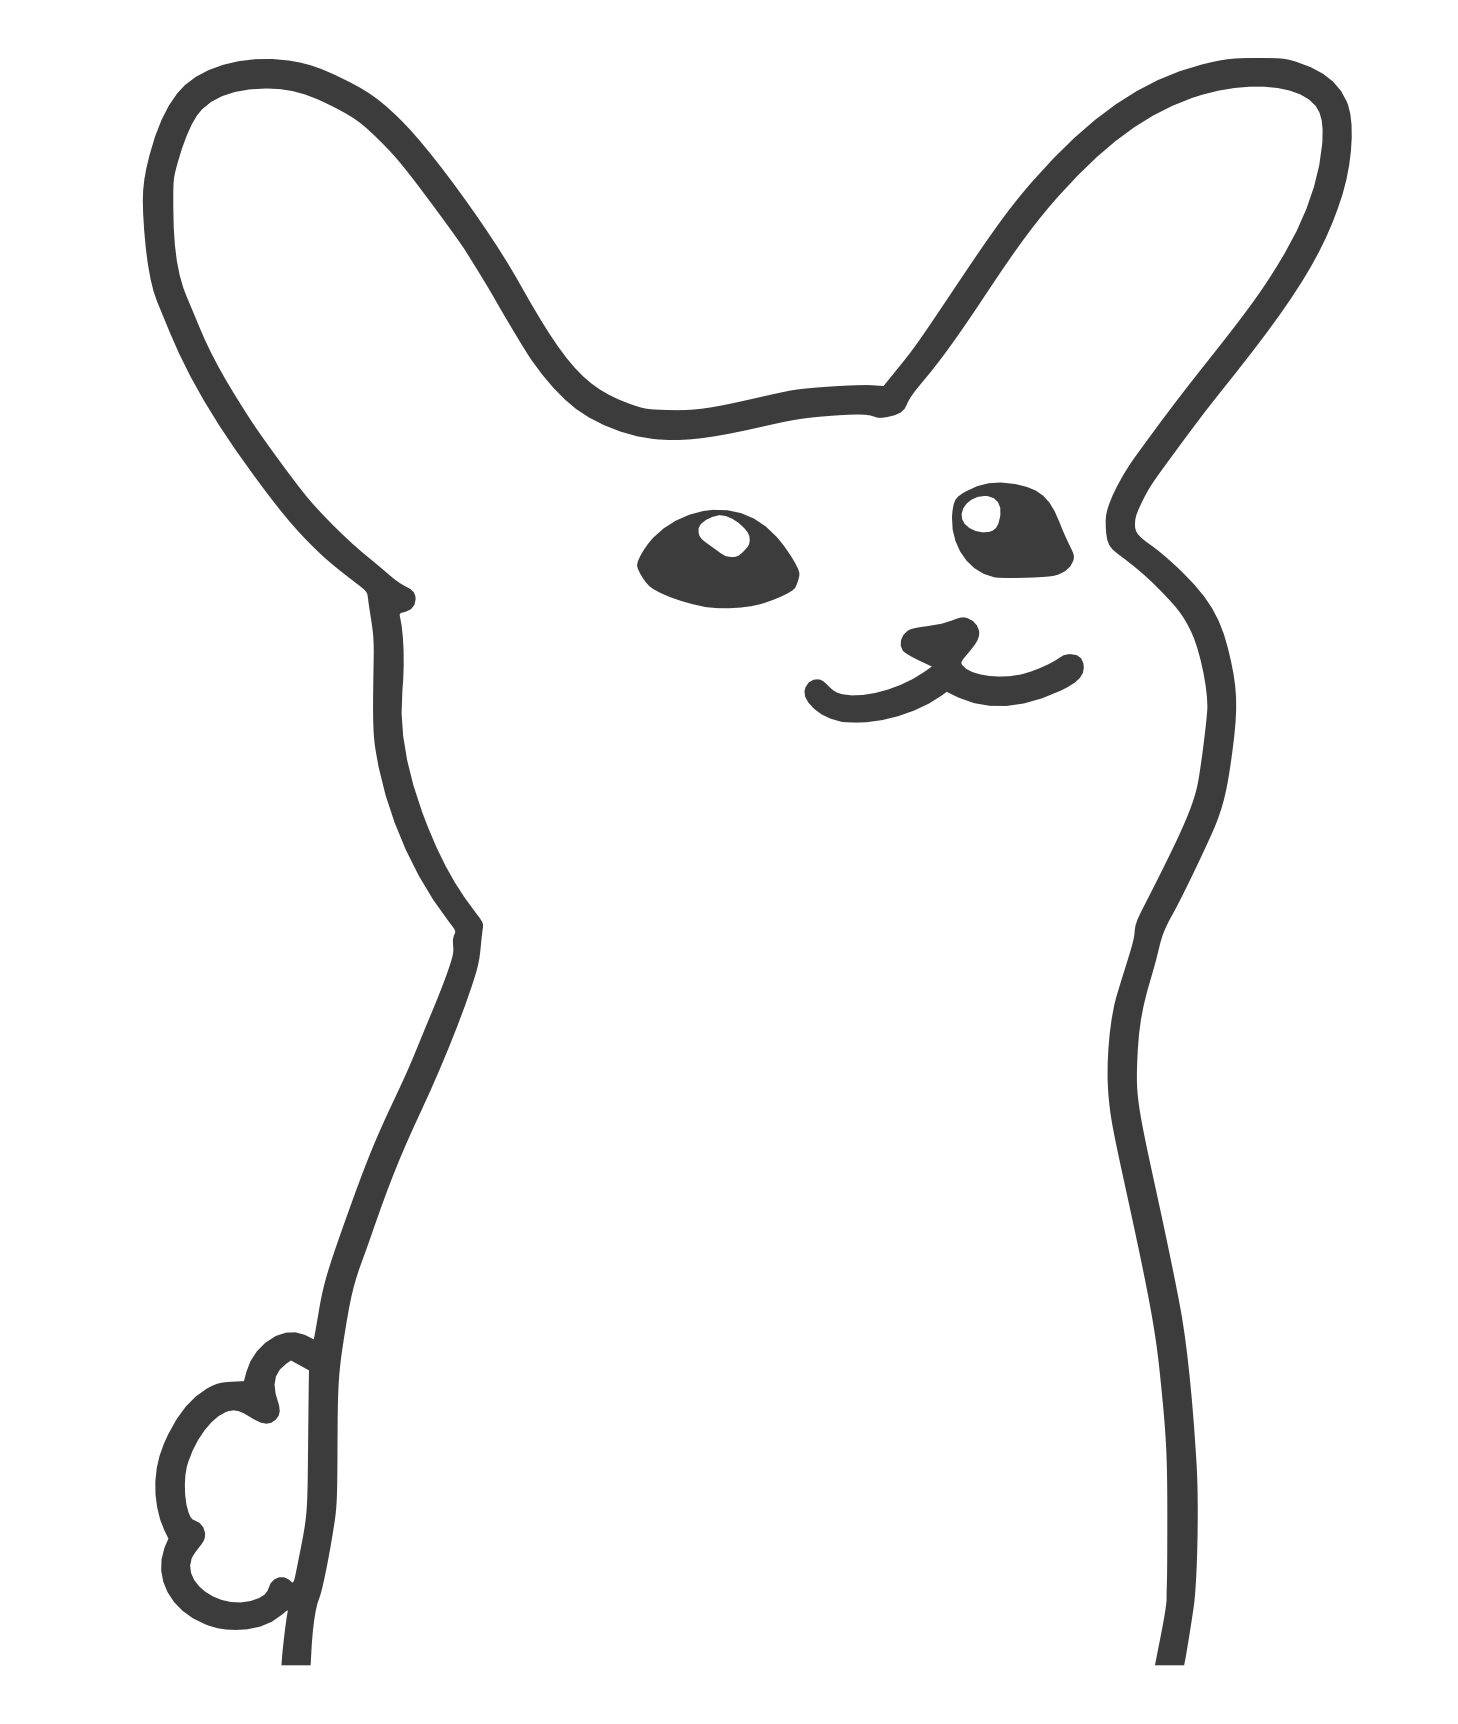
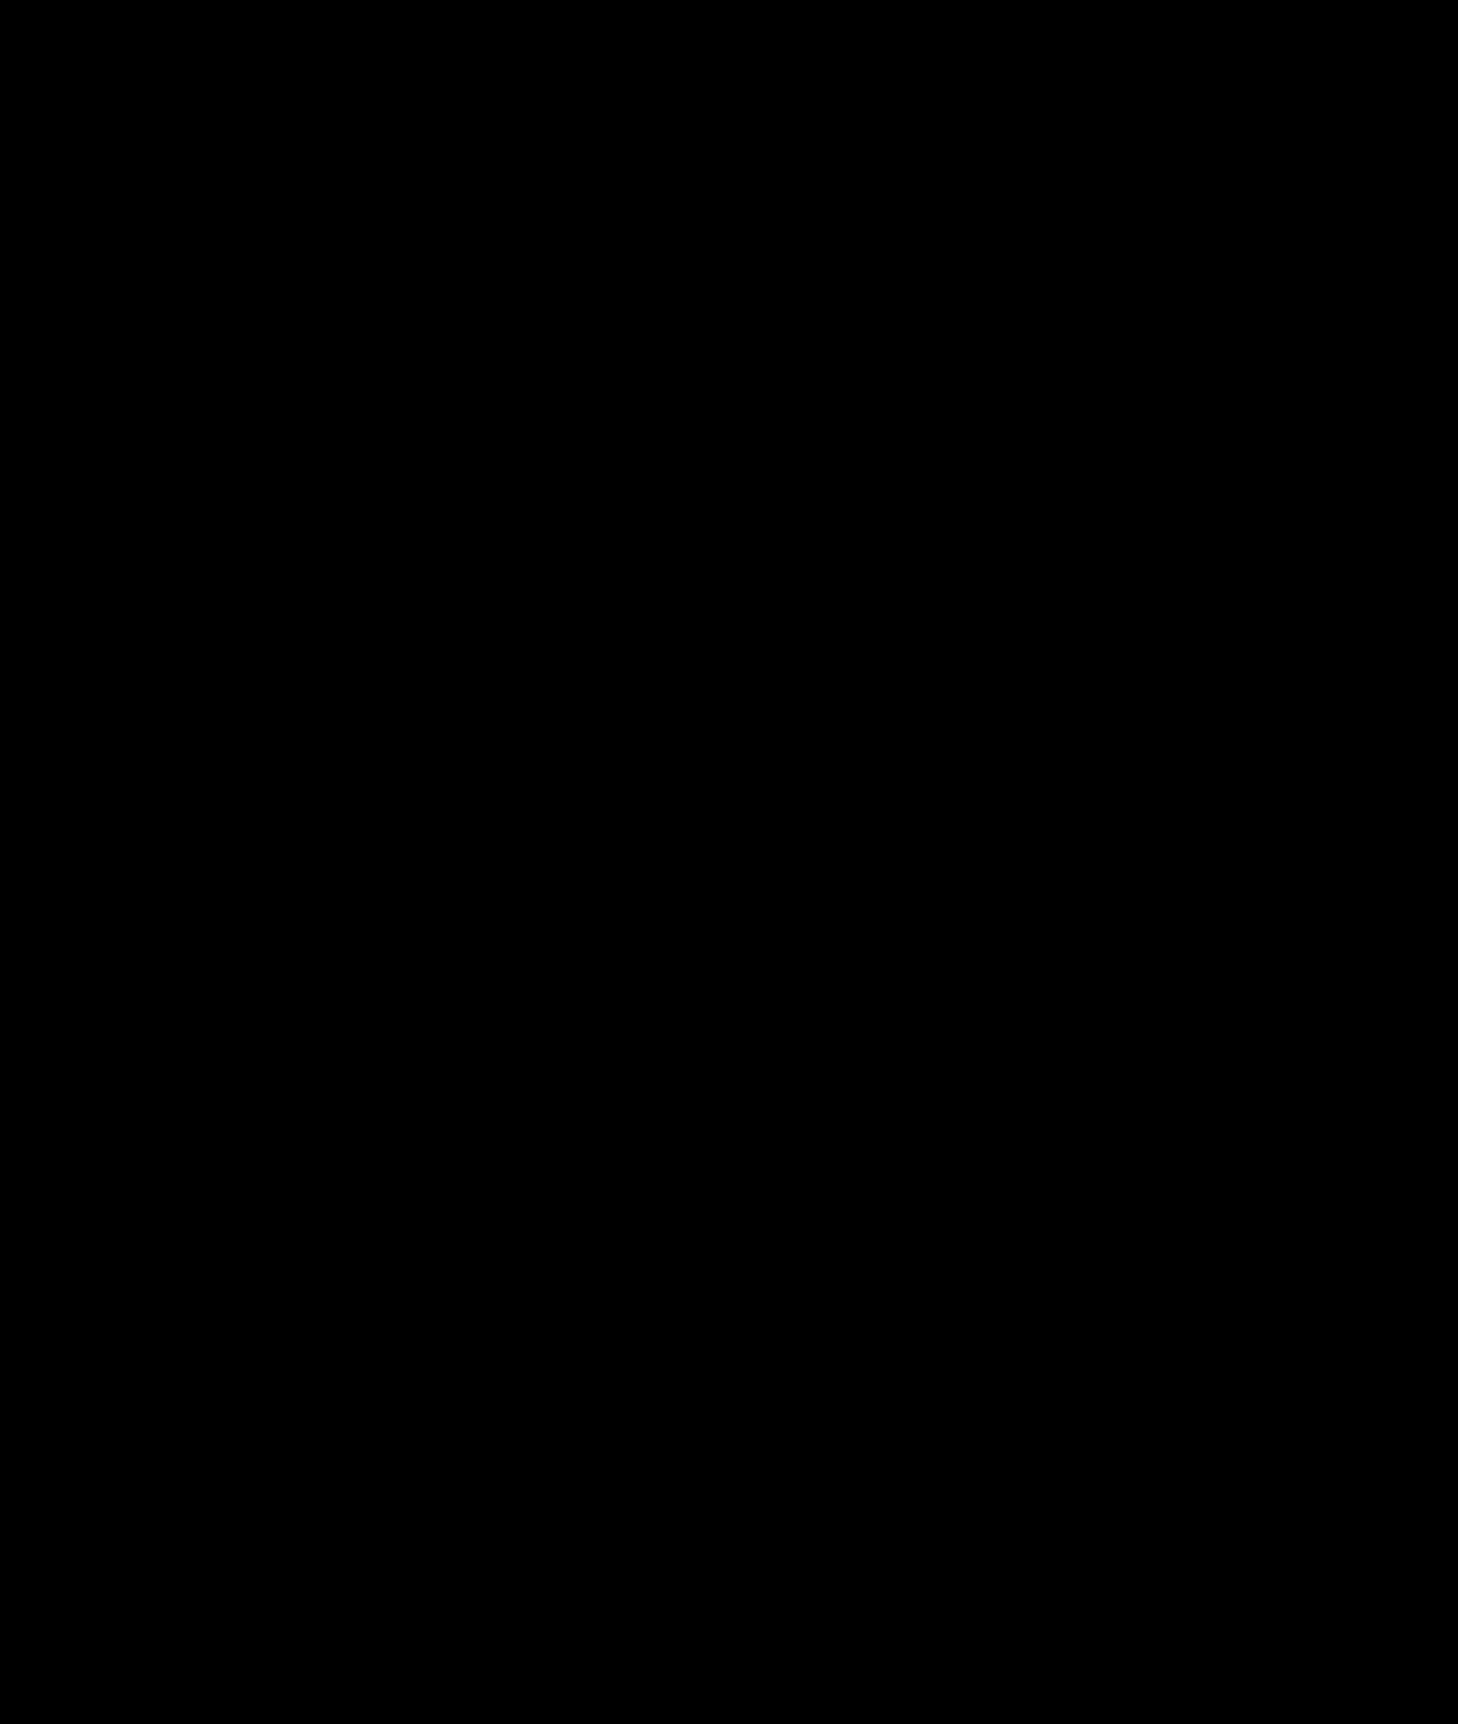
drawing: [142, 57, 1352, 1666] -> none

